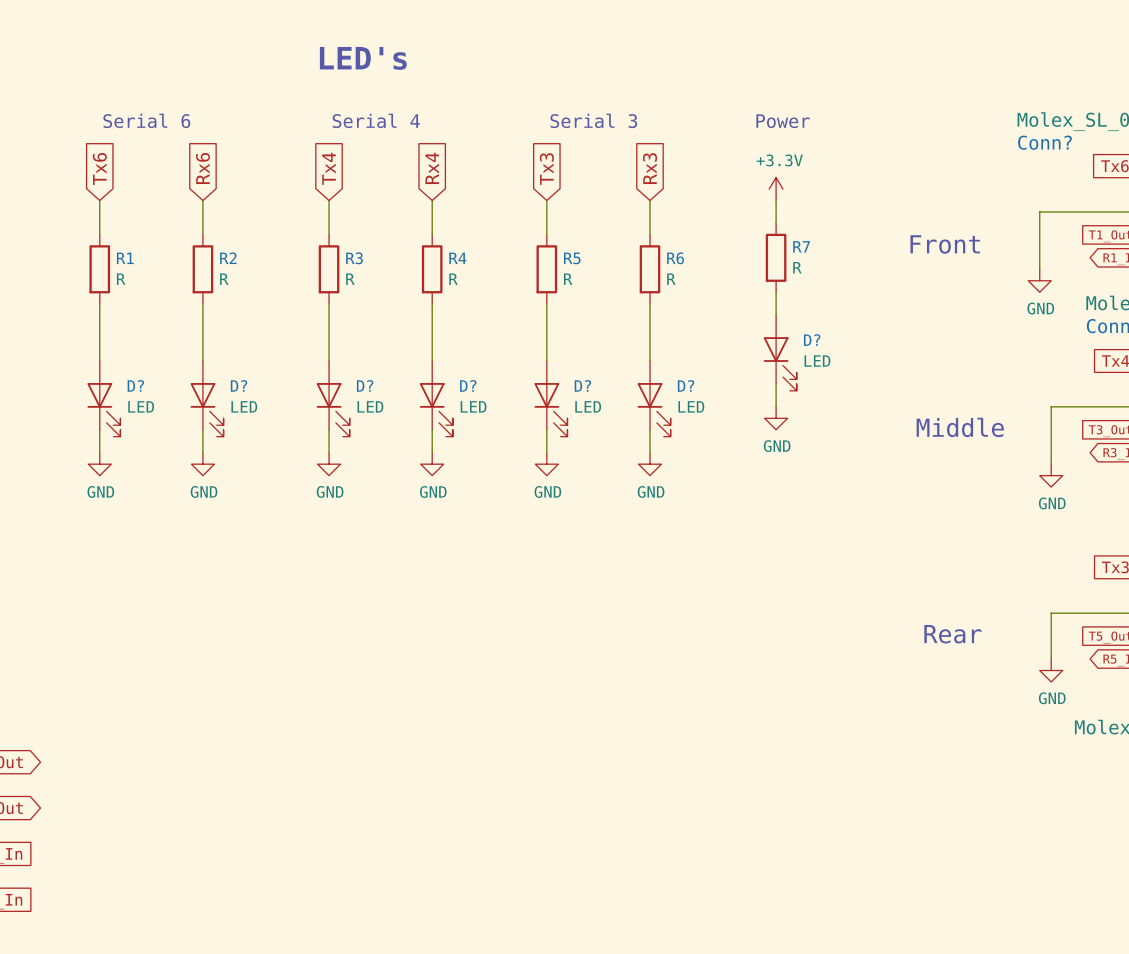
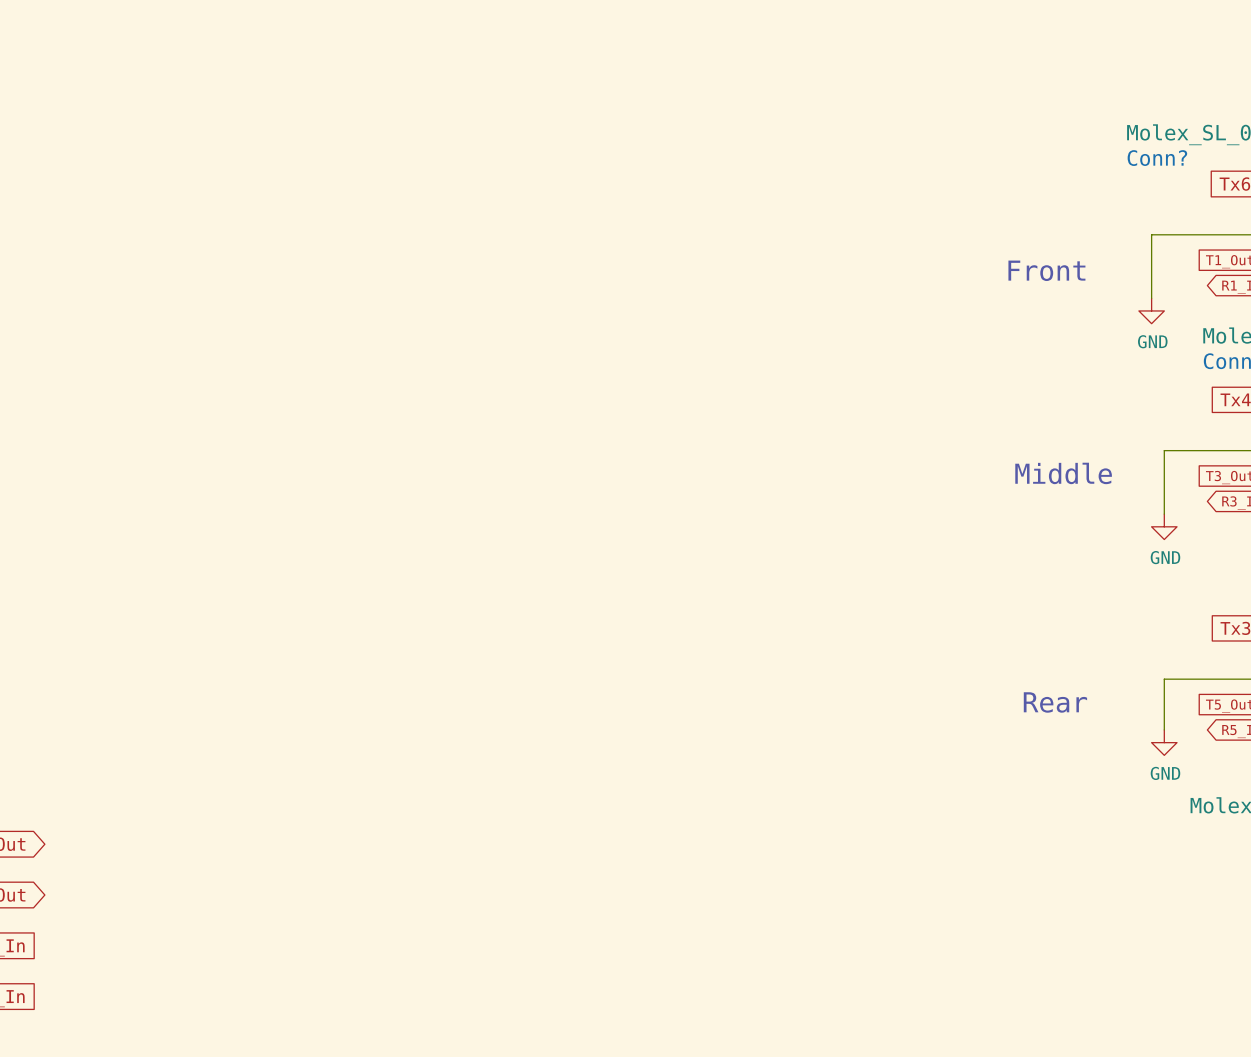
text: LED's (363, 58) -> none
text: Serial 6 (146, 120) -> none
text: Serial 4 (376, 120) -> none
text: Serial 3 (593, 120) -> none
text: Power (783, 121) -> none
global label: Tx6 (99, 168) -> none
global label: Rx6 (202, 168) -> none
global label: Tx4 (329, 168) -> none
global label: Rx4 (432, 168) -> none
global label: Rx3 (650, 168) -> none
global label: Tx3 (546, 169) -> none
power symbol: +3.3V (776, 189) -> none
wire: (99, 200) (99, 234) -> none
wire: (202, 200) (202, 234) -> none
wire: (329, 200) (329, 234) -> none
wire: (432, 200) (432, 234) -> none
wire: (546, 200) (546, 234) -> none
wire: (650, 200) (650, 234) -> none
wire: (776, 200) (776, 223) -> none
R7: R (776, 257) -> none
R1: R (99, 269) -> none
R2: R (202, 269) -> none
R3: R (329, 269) -> none
R4: R (432, 269) -> none
R5: R (546, 269) -> none
R6: R (650, 269) -> none
wire: (776, 292) (776, 315) -> none
wire: (99, 303) (99, 361) -> none
wire: (202, 303) (202, 361) -> none
wire: (329, 303) (329, 361) -> none
wire: (432, 303) (432, 361) -> none
wire: (546, 303) (546, 361) -> none
wire: (650, 303) (650, 361) -> none
D?: LED (780, 352) -> none
wire: (776, 383) (776, 406) -> none
D?: LED (103, 398) -> none
D?: LED (207, 398) -> none
D?: LED (333, 398) -> none
D?: LED (436, 398) -> none
D?: LED (550, 398) -> none
D?: LED (654, 398) -> none
power symbol: GND (776, 418) -> none
wire: (99, 429) (99, 452) -> none
wire: (202, 429) (202, 452) -> none
wire: (329, 429) (329, 452) -> none
wire: (432, 429) (432, 452) -> none
wire: (546, 429) (546, 452) -> none
wire: (650, 429) (650, 452) -> none
power symbol: GND (99, 464) -> none
power symbol: GND (202, 464) -> none
power symbol: GND (329, 464) -> none
power symbol: GND (432, 464) -> none
power symbol: GND (546, 464) -> none
power symbol: GND (650, 464) -> none

